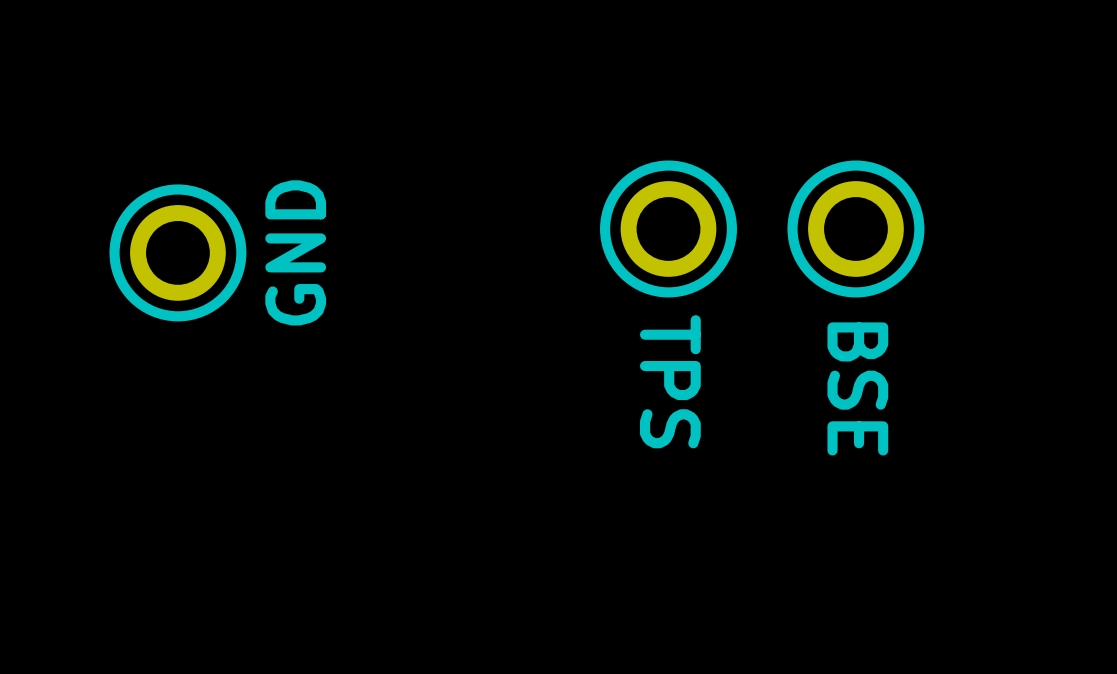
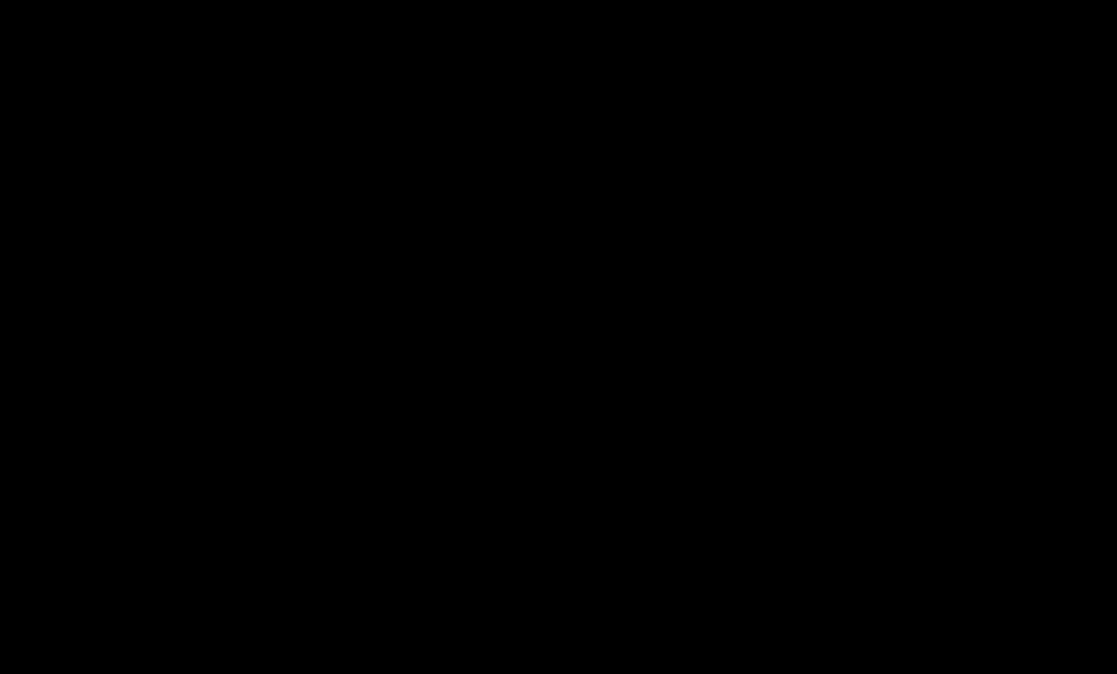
part: (668, 228) -> none
part: (855, 228) -> none
part: (177, 252) -> none

